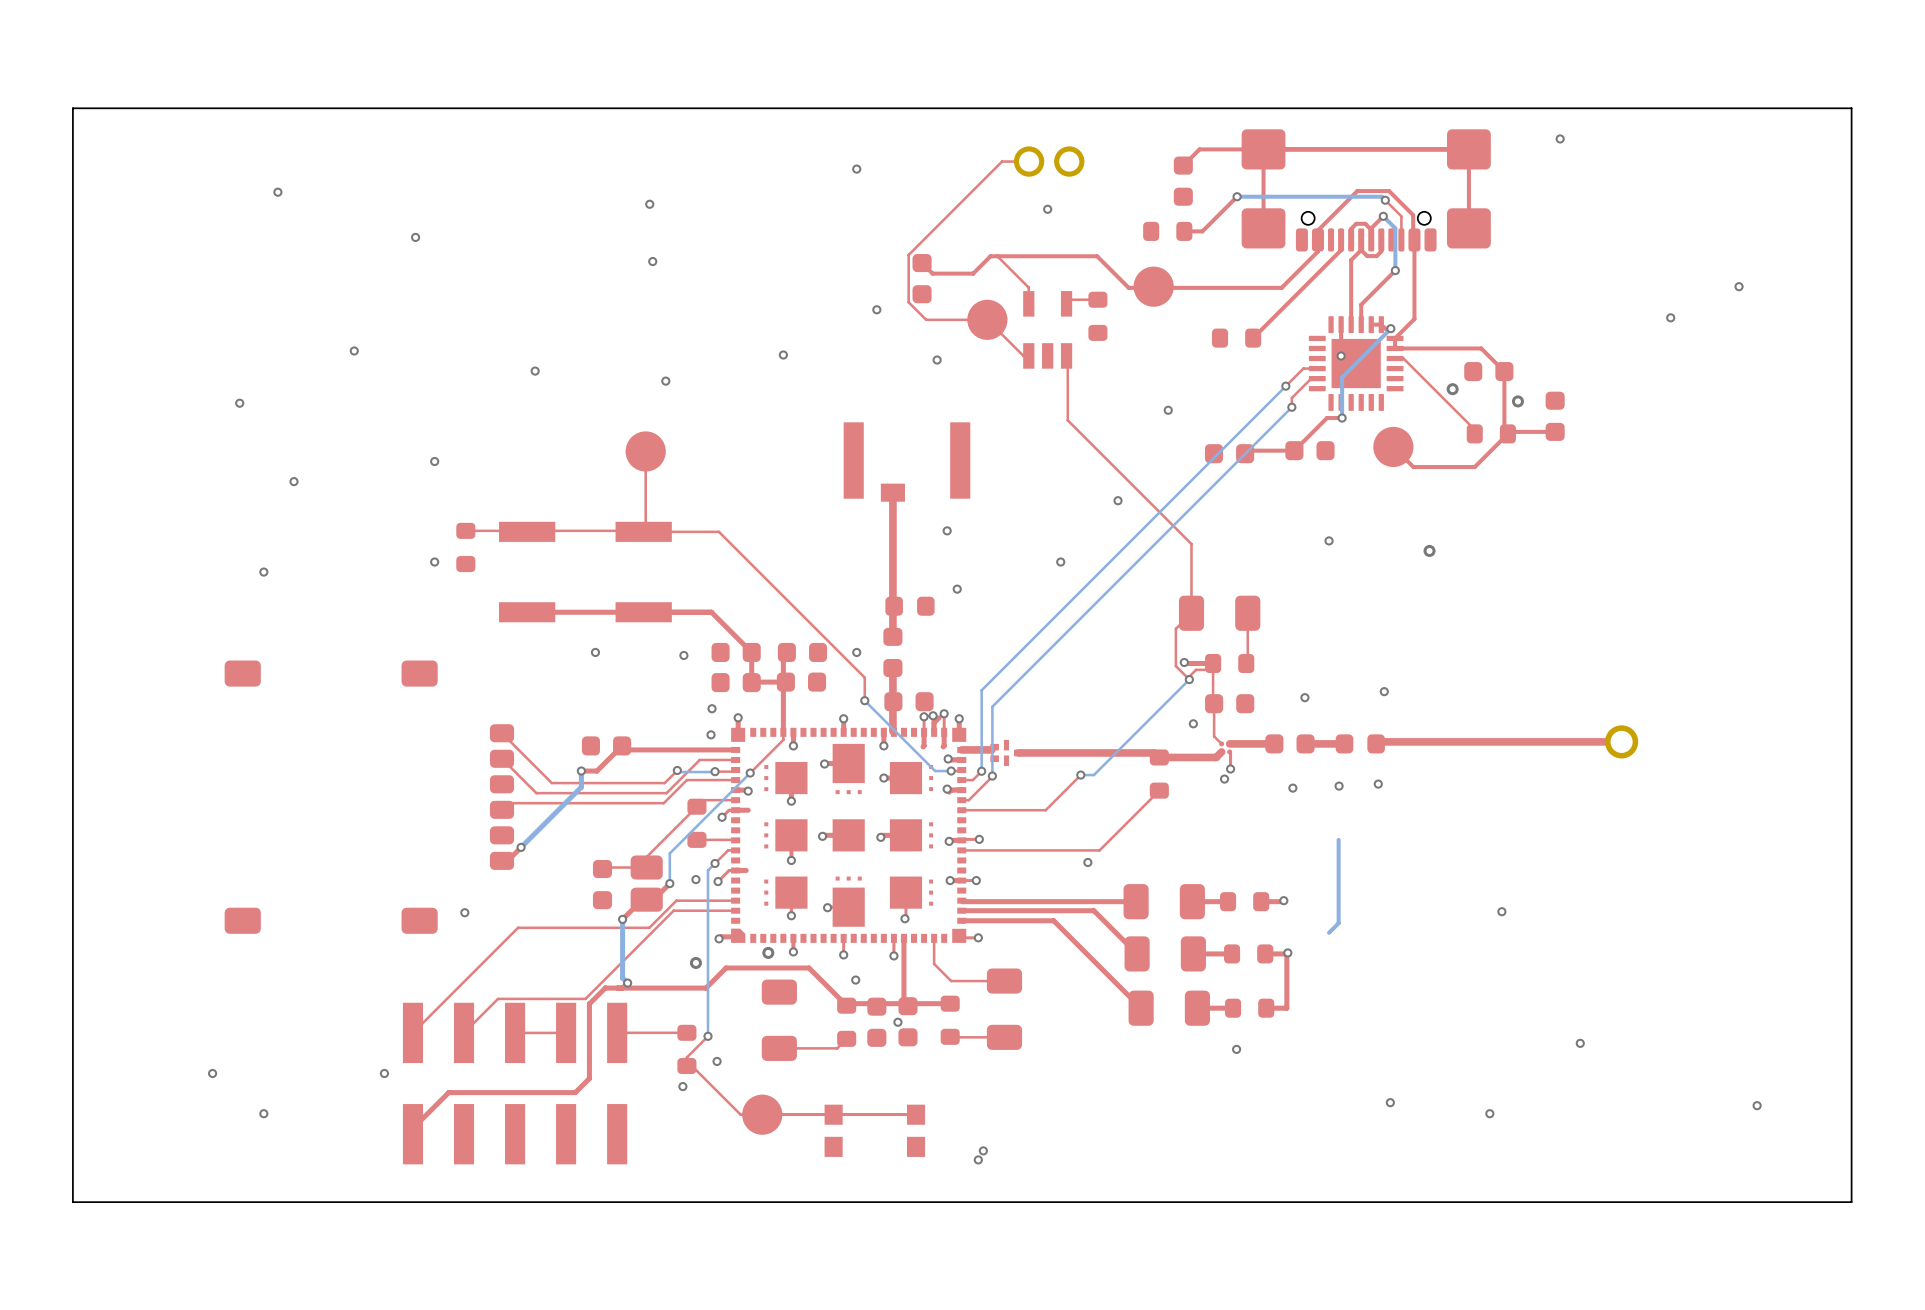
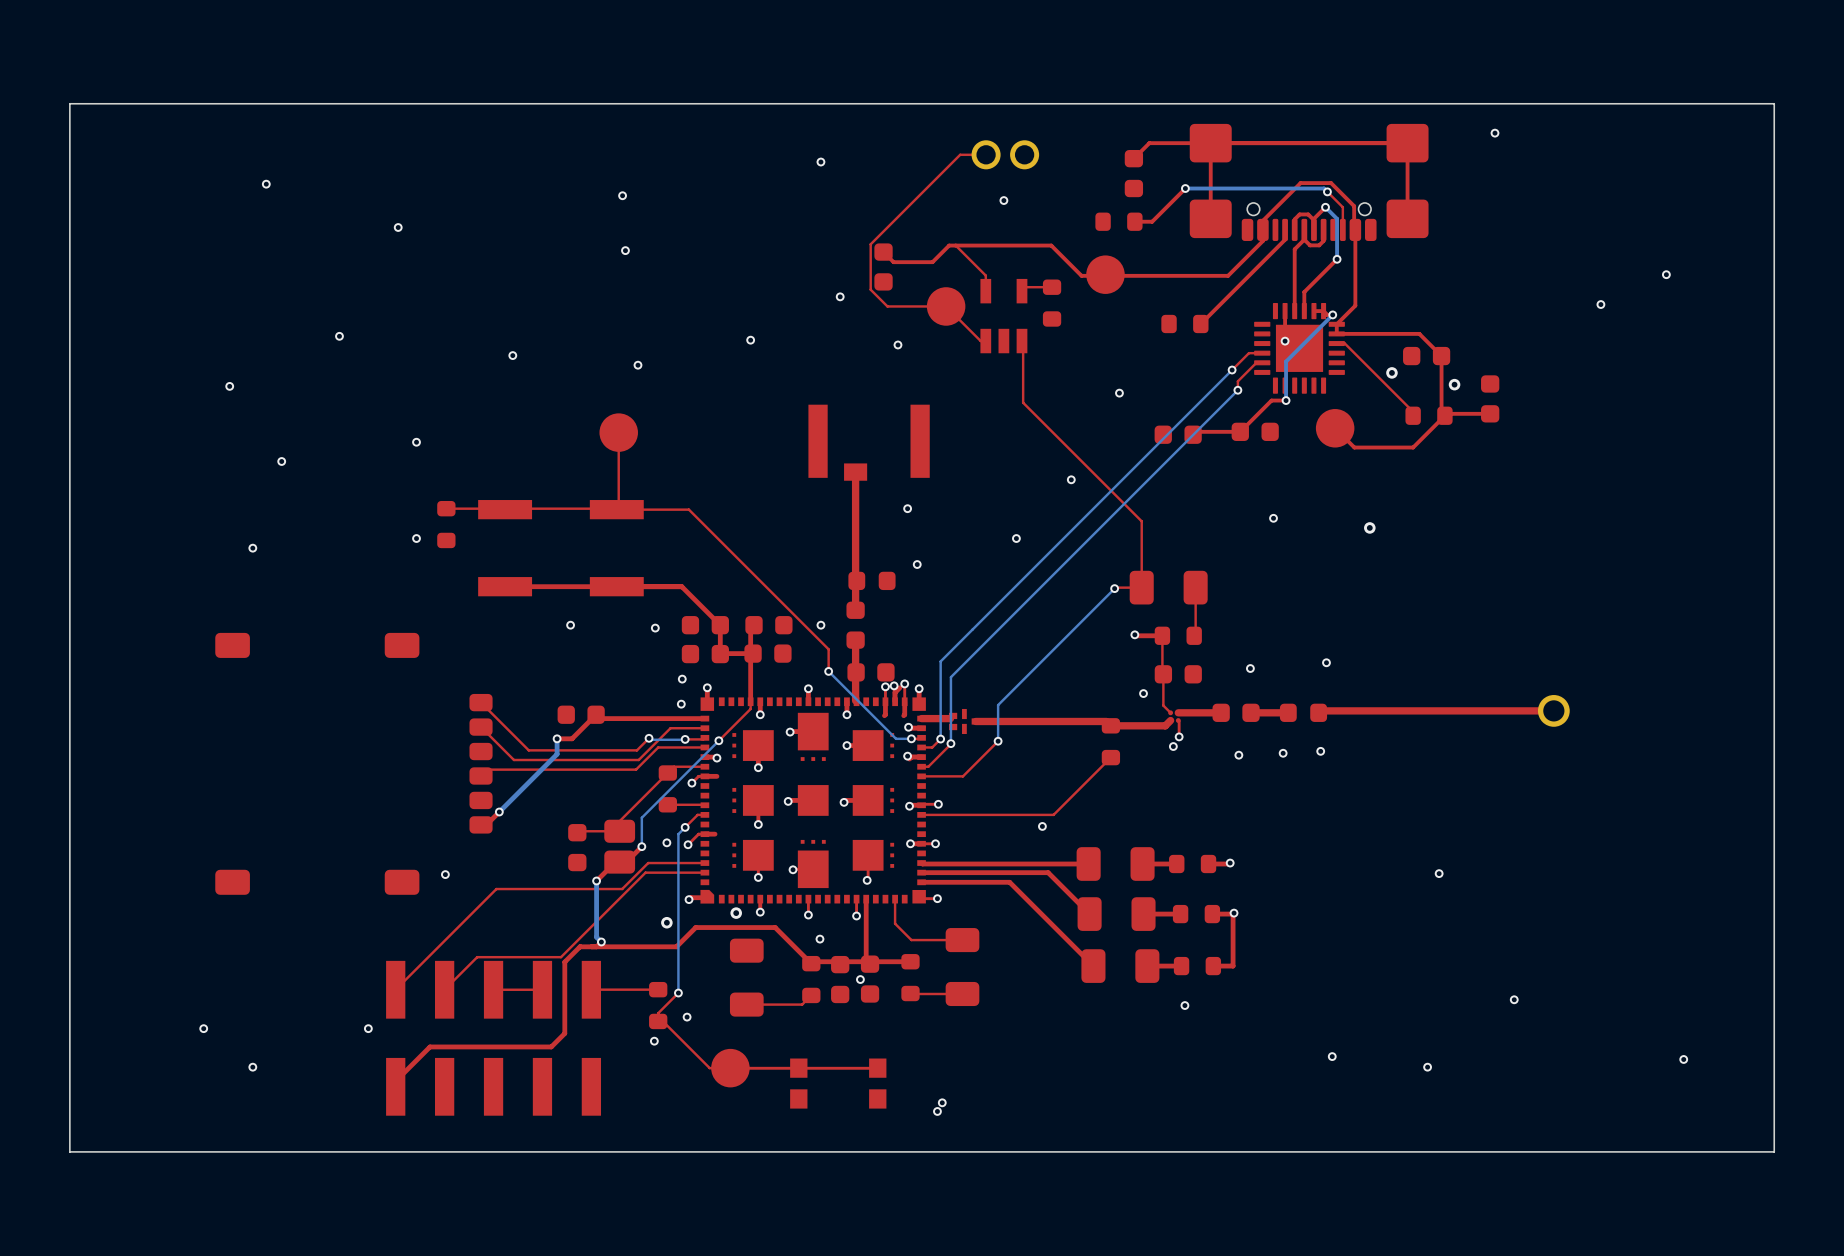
top track: (1191, 613) (1175, 628) (1175, 666) (1189, 679) (1189, 676) (1196, 669) (1207, 669) -> (1141, 587) (1114, 588)
bottom track: none -> (1114, 588) (998, 705) (998, 741)
bottom track: (1189, 679) (1093, 775) (1080, 775) -> none
via position: (1189, 679) -> (1114, 588)
top track: (1080, 775) (1045, 810) (1004, 810) -> (998, 741) (962, 776)
via position: (1080, 775) -> (998, 741)
bottom track: (1338, 839) (1338, 923) (1329, 932) -> none

